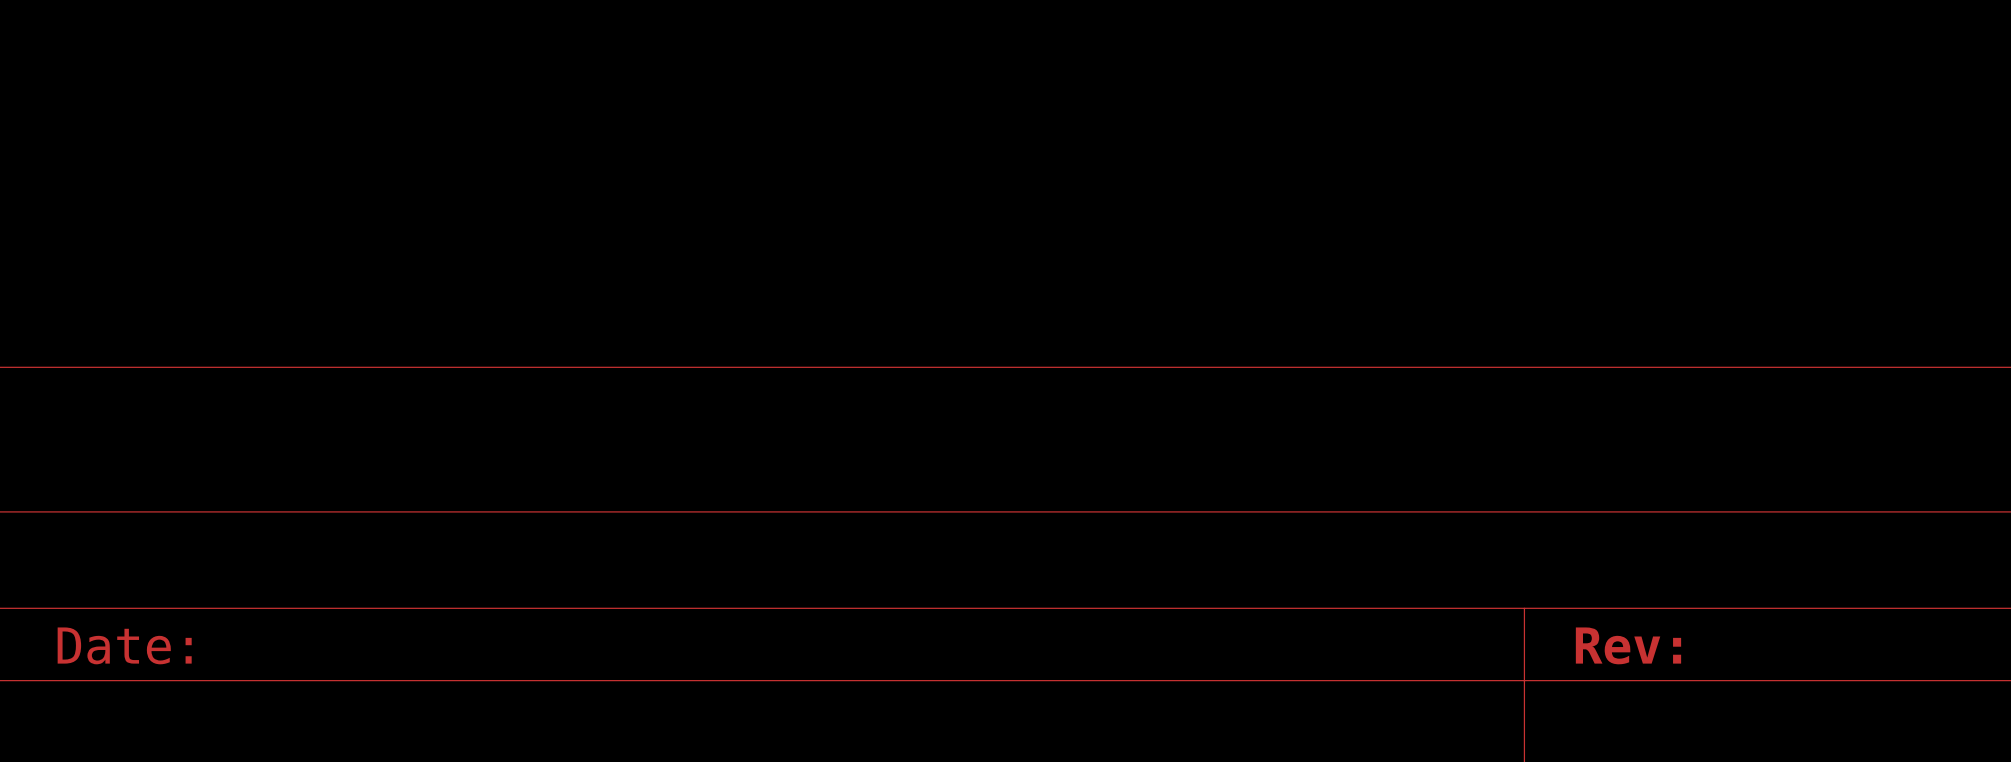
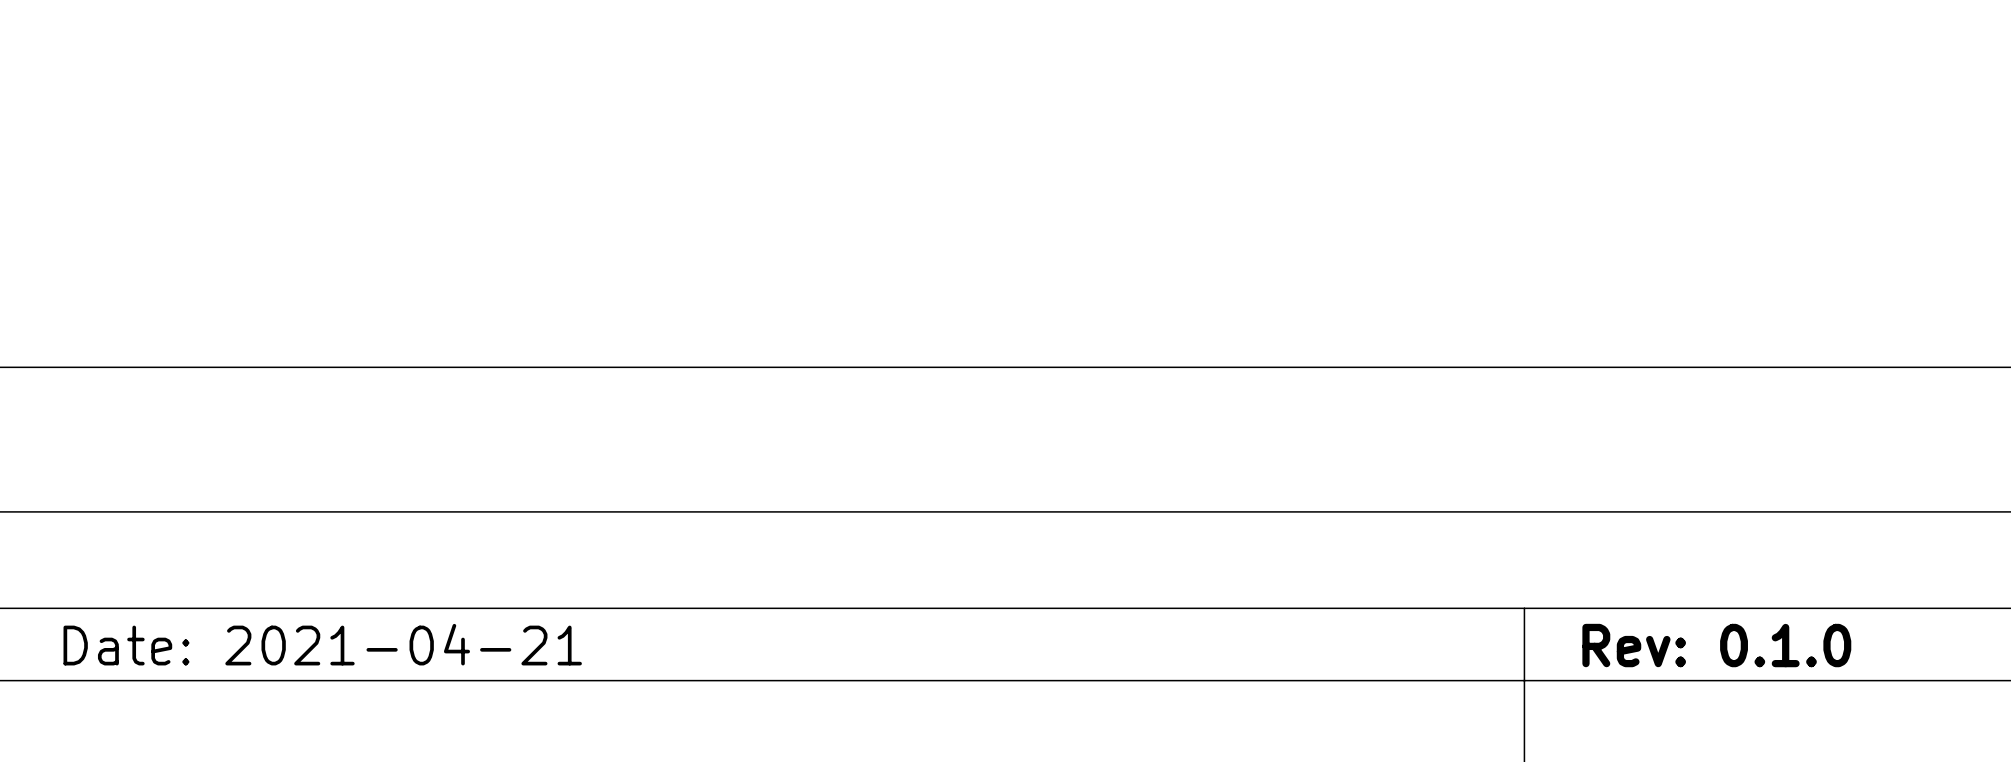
title block: Date: (124, 645) -> Date: 2021-04-21 (322, 644)
title block: Rev: (1628, 645) -> Rev: 0.1.0 (1716, 645)

